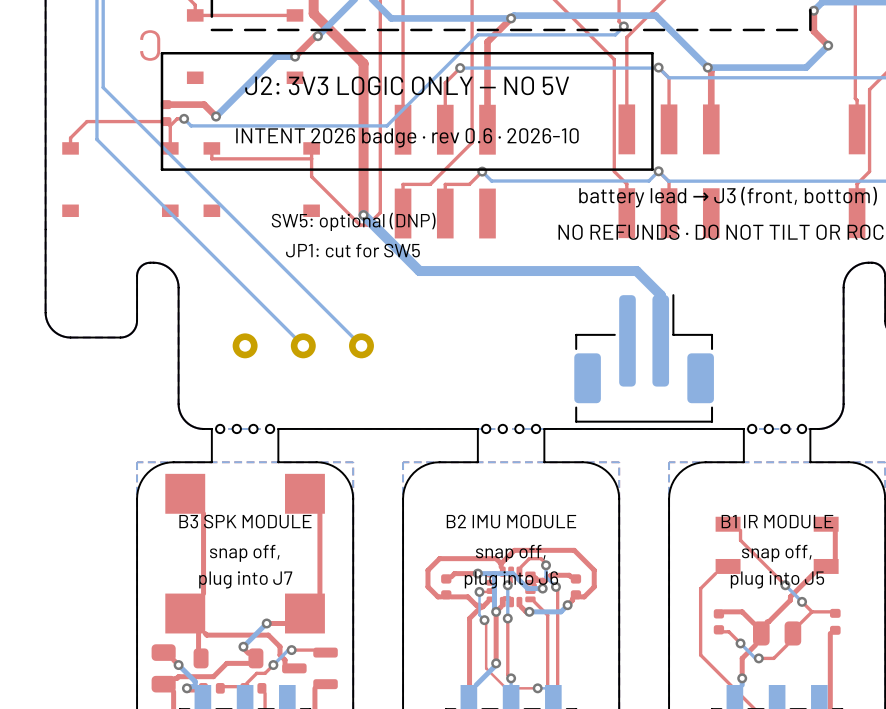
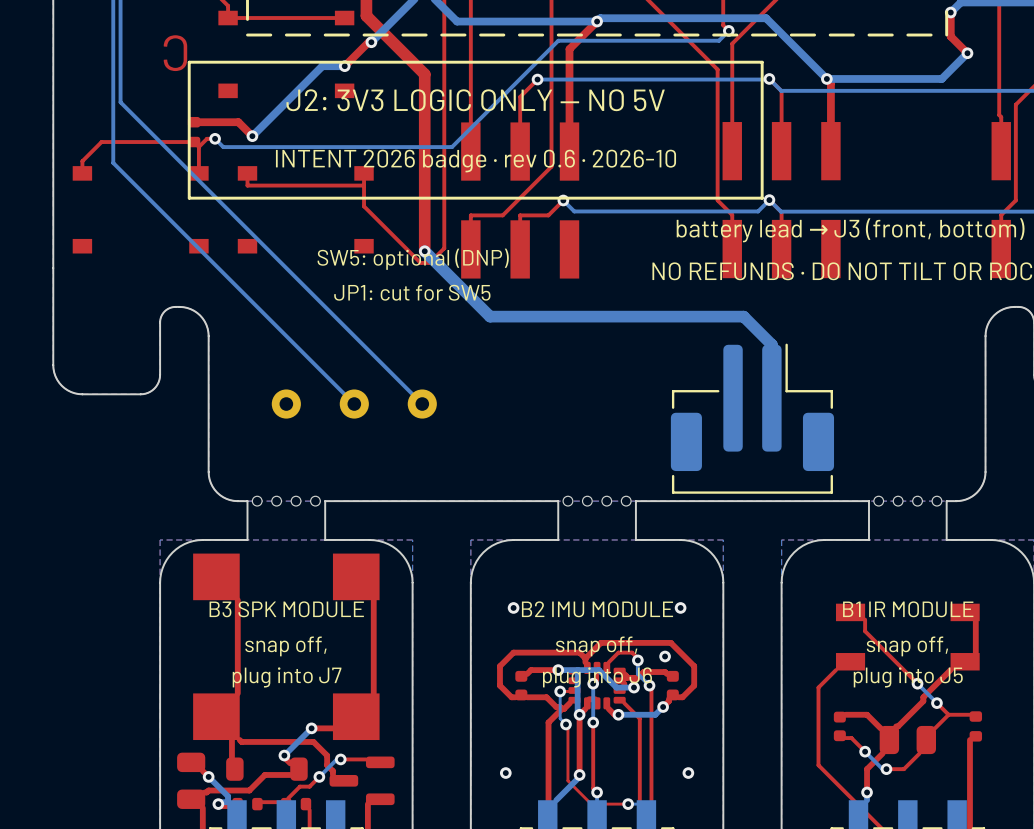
via: none -> (513, 607)
via: none -> (680, 607)
via: none -> (665, 656)
via: none -> (505, 773)
via: none -> (688, 773)

